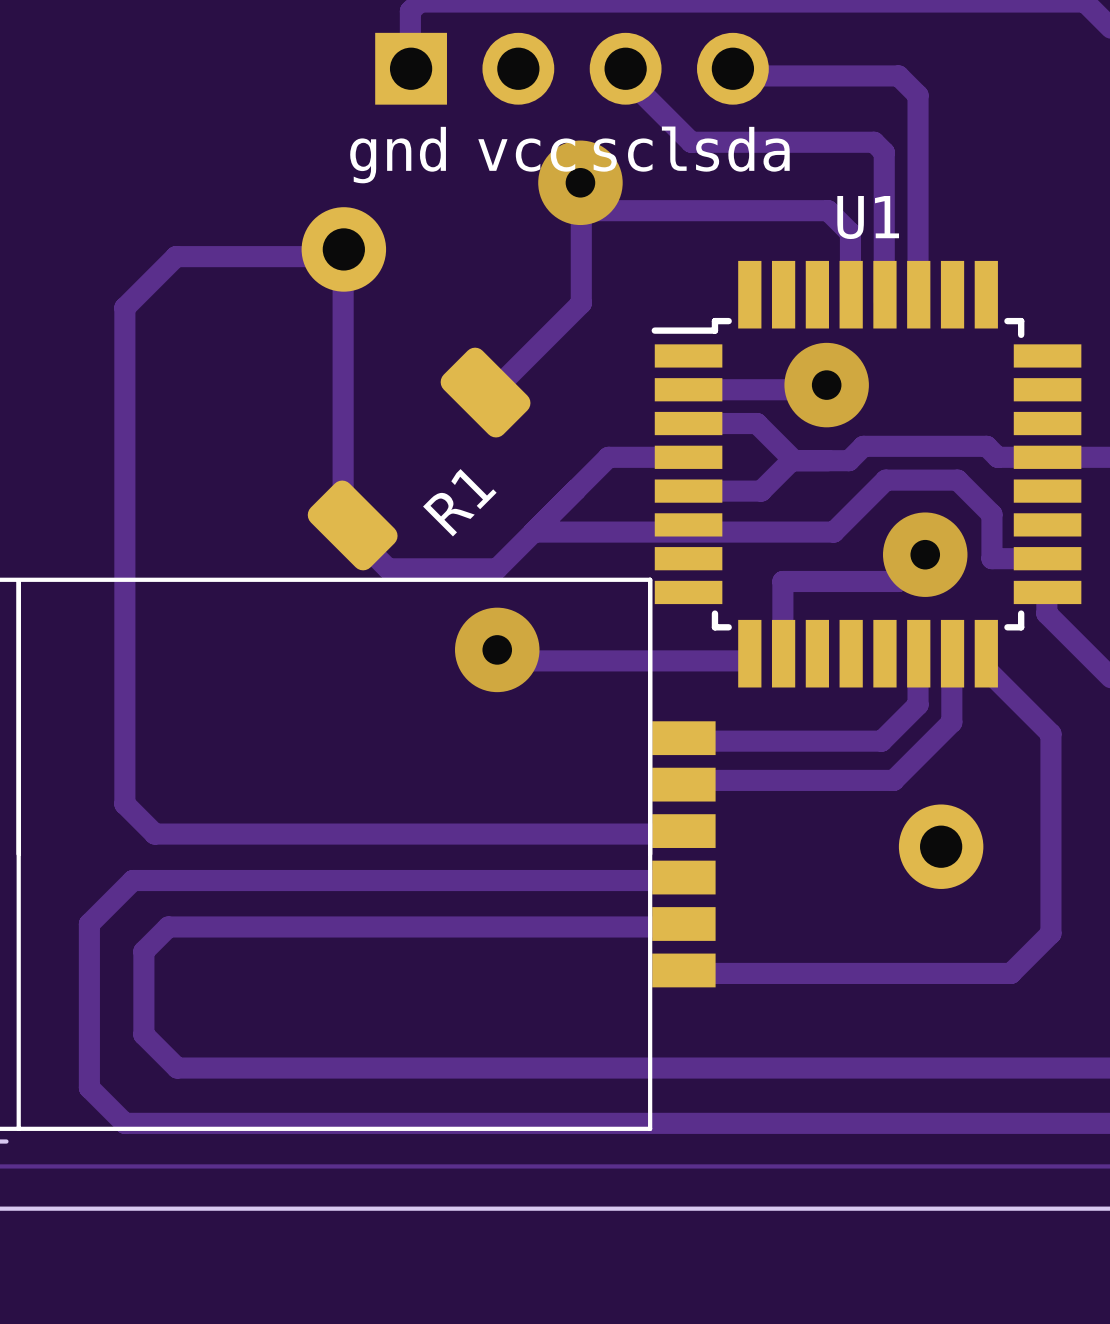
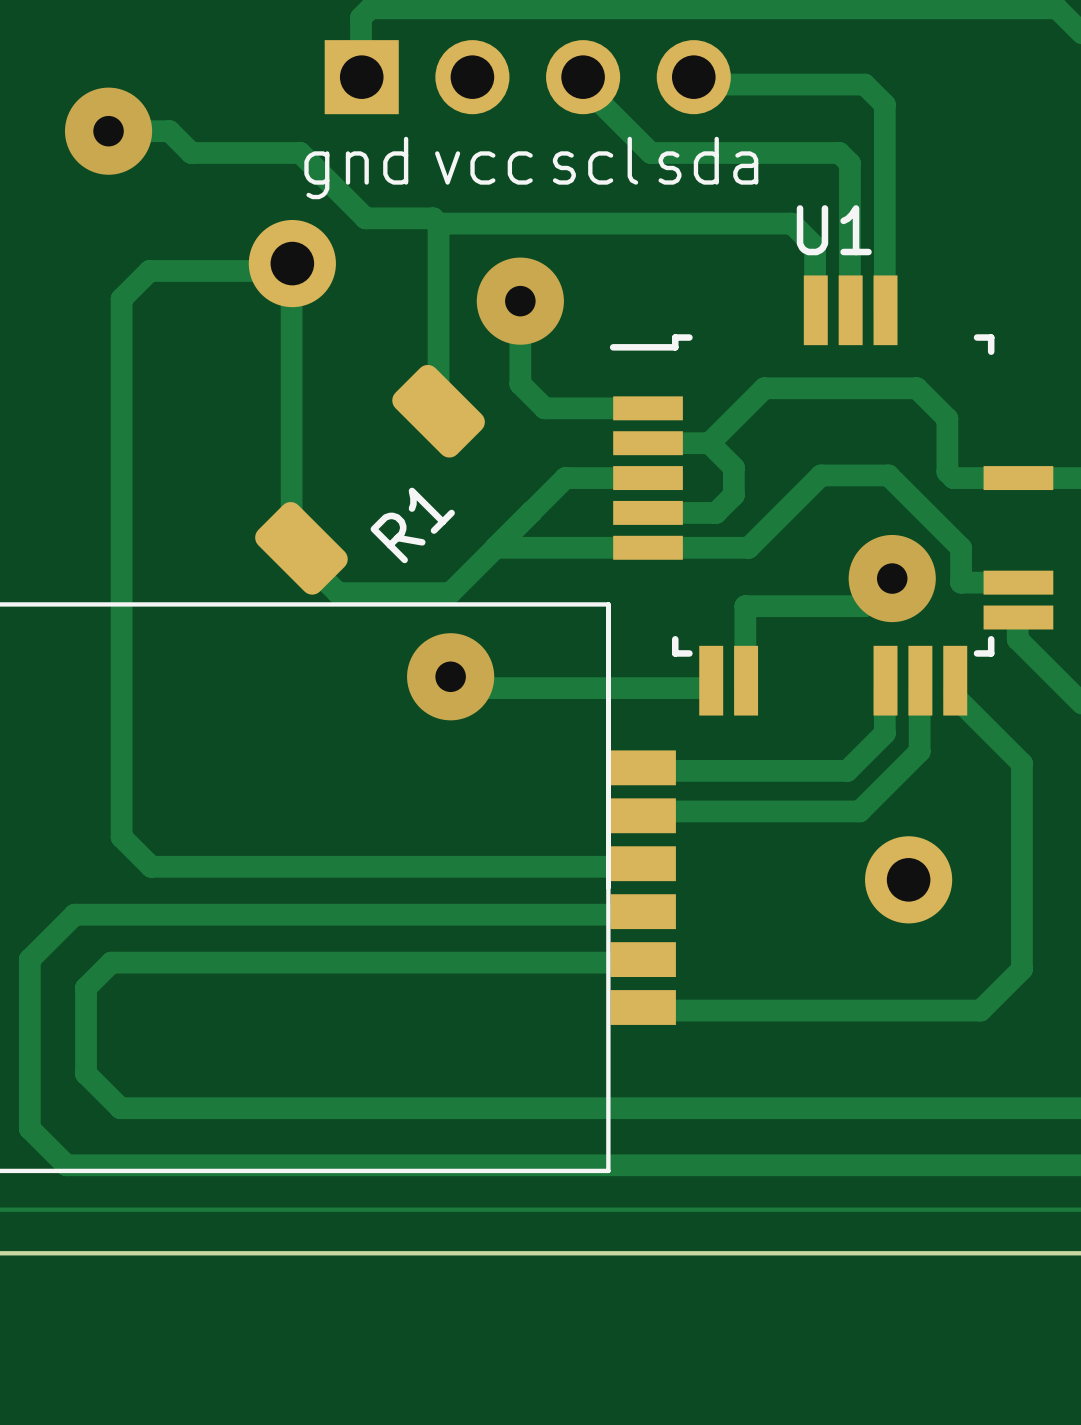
track: none -> (108, 131) (169, 131) (191, 152) (300, 152) (365, 218) (433, 218) (438, 223)
via: none -> (108, 131)
via position: (580, 182) -> (520, 301)
track: none -> (438, 223) (438, 411)
track: (581, 210) (581, 303) (484, 399) -> (537, 223) (438, 223)
track: (205, 256) (176, 256) (124, 307) (124, 804) (154, 834) (207, 834) -> (149, 270) (121, 298) (121, 837) (151, 866)
U1 footprint: [651, 260, 1082, 688] -> [609, 275, 1054, 716]
track: (826, 385) (822, 389) (688, 389) -> (540, 301) (520, 301) (520, 383) (544, 408) (648, 408)
via: (826, 385) -> none
track: (748, 423) (756, 423) (794, 460) -> none
track: (997, 457) (986, 446) (863, 446) (849, 460) (791, 460) (761, 491) (754, 491) -> (967, 478) (953, 478) (947, 471) (947, 418) (916, 388) (764, 388) (709, 443) (733, 467) (733, 495) (716, 512)
track: (991, 525) (991, 514) (957, 480) (885, 480) (833, 532) (533, 532) -> (961, 547) (888, 475) (821, 475) (748, 547) (495, 547)

